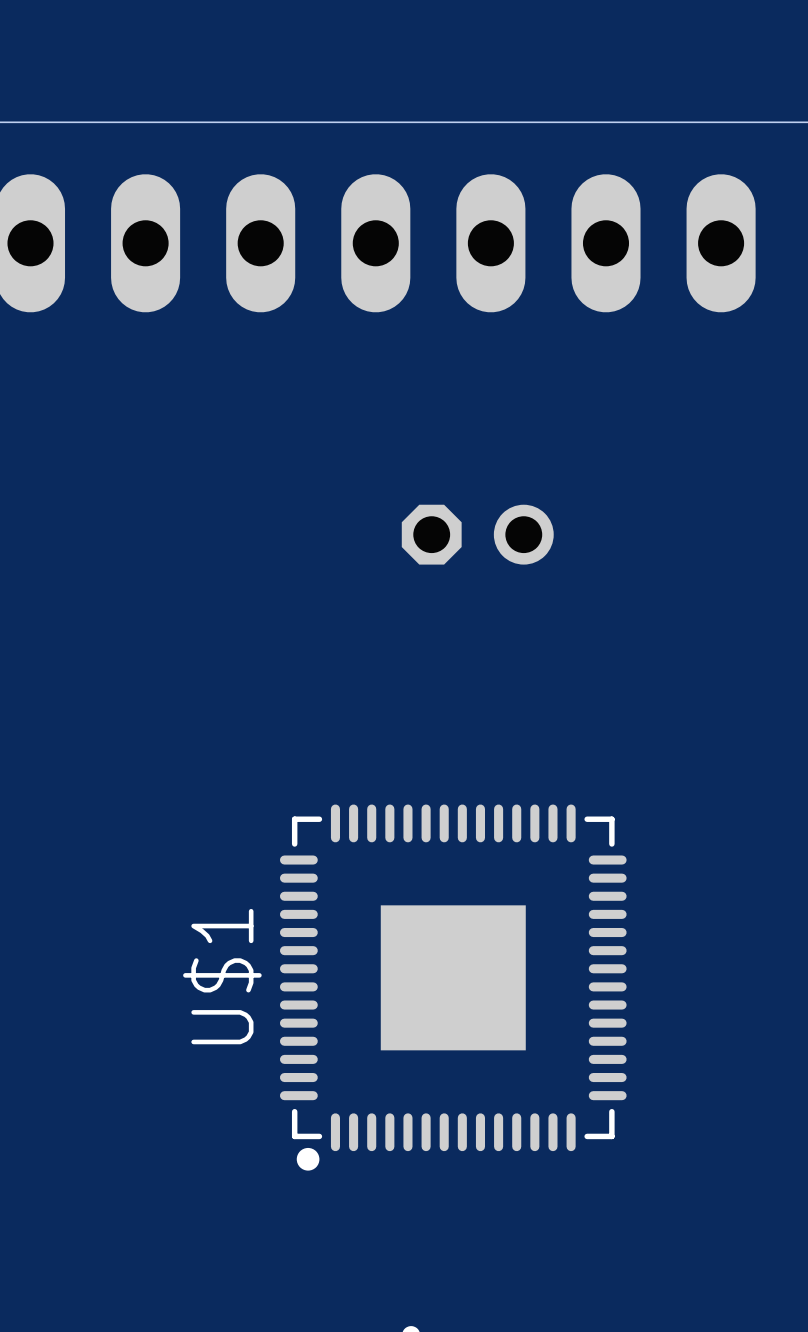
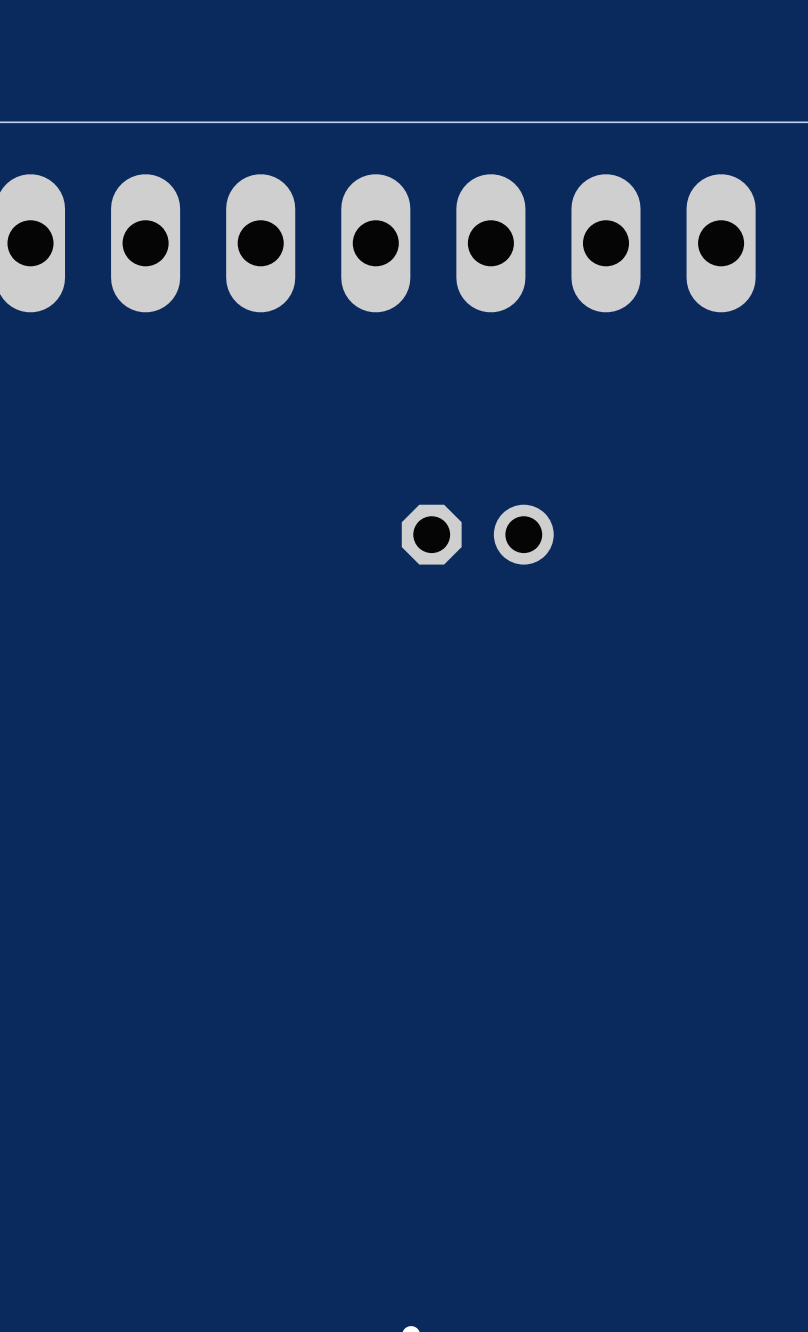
U$1: (453, 987) -> none

